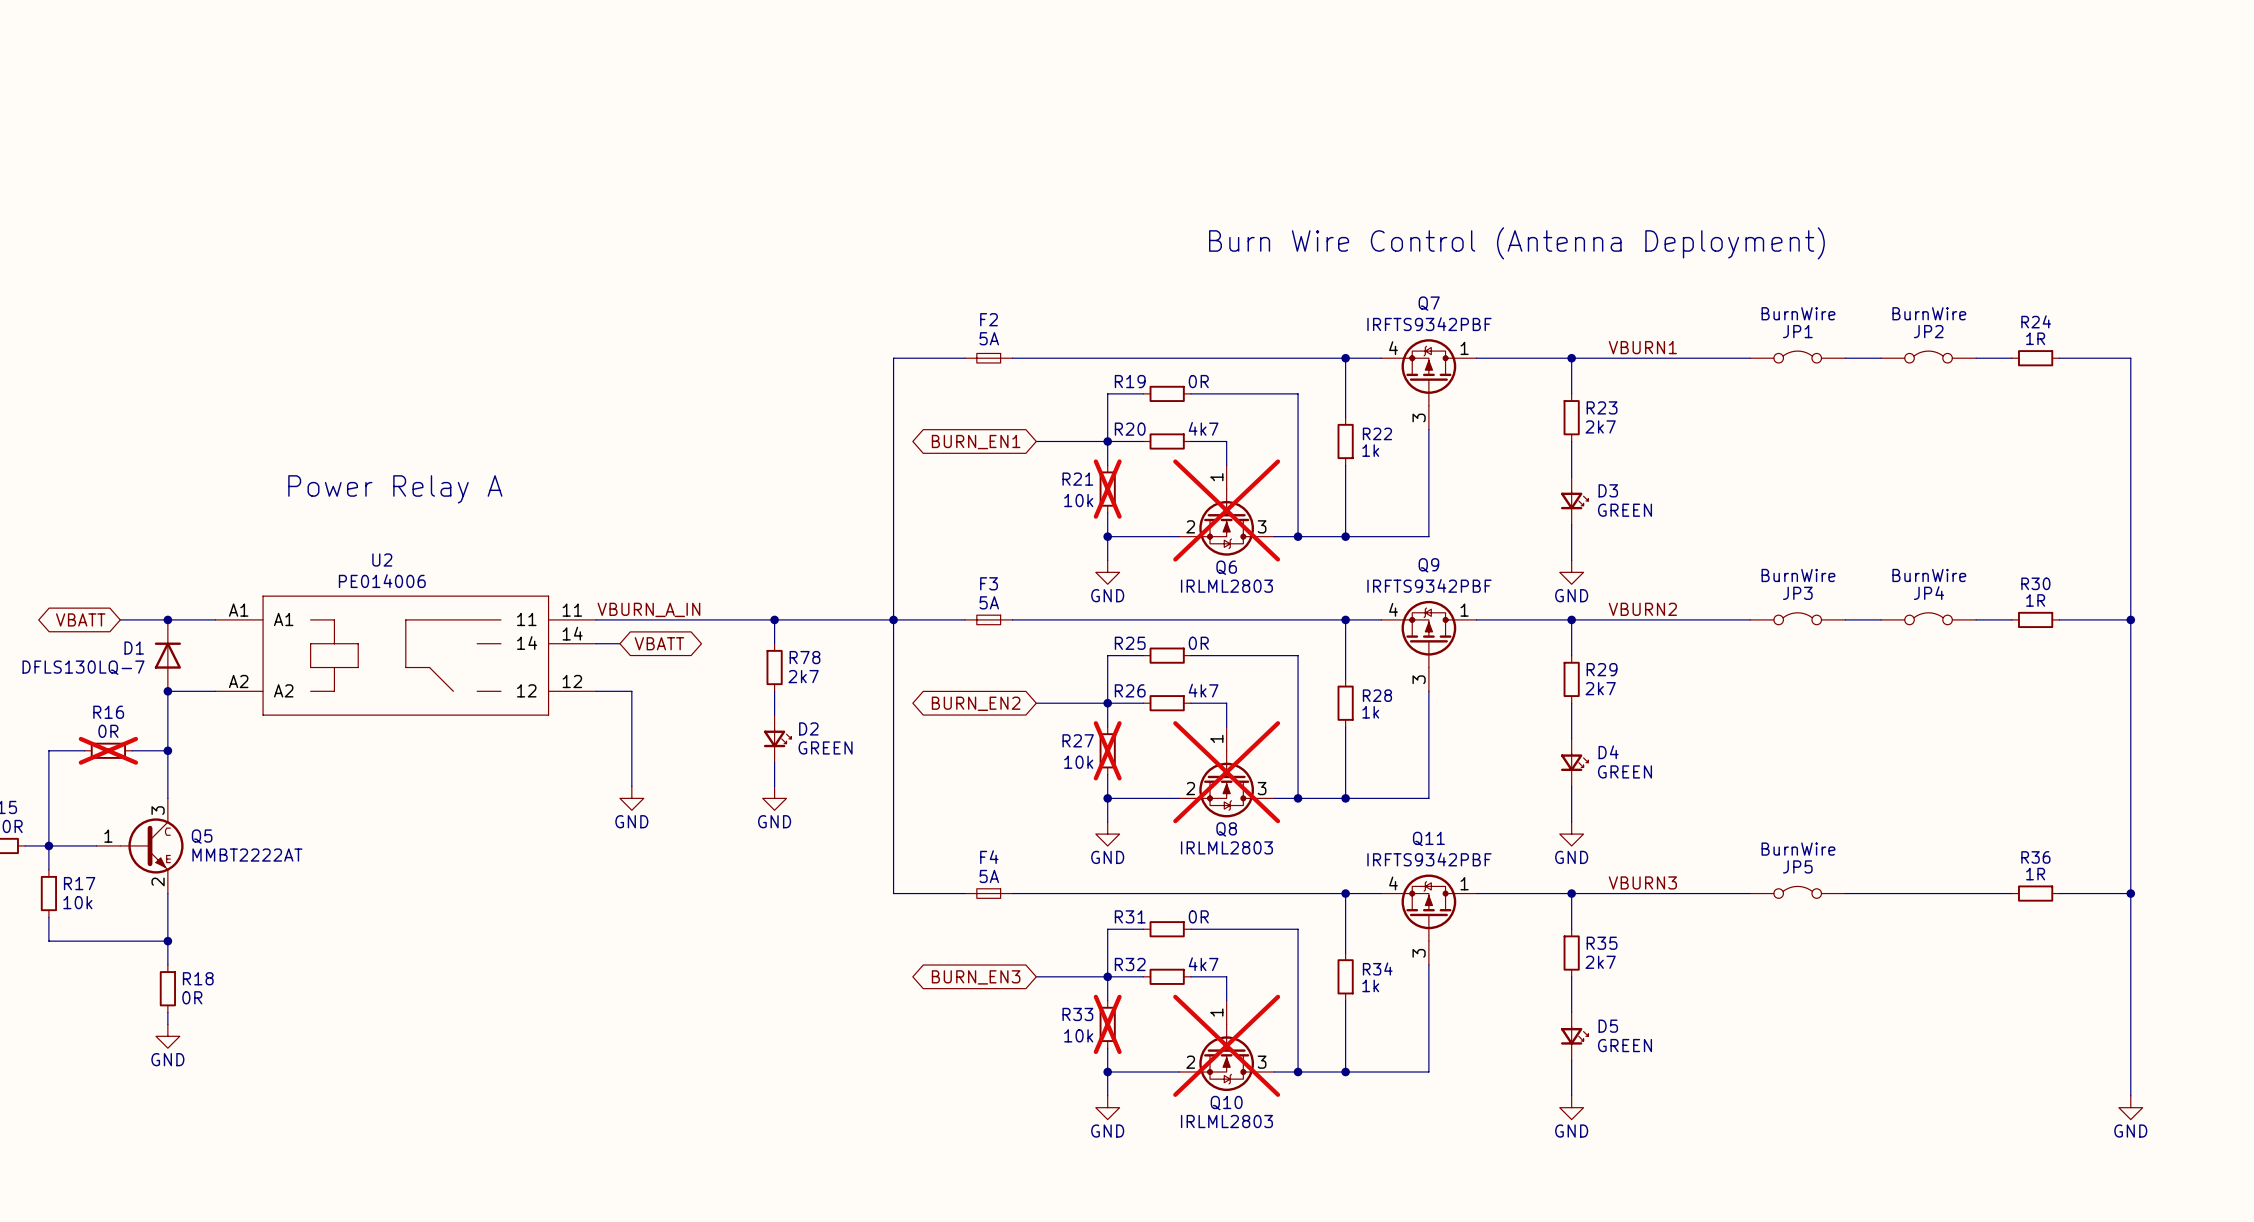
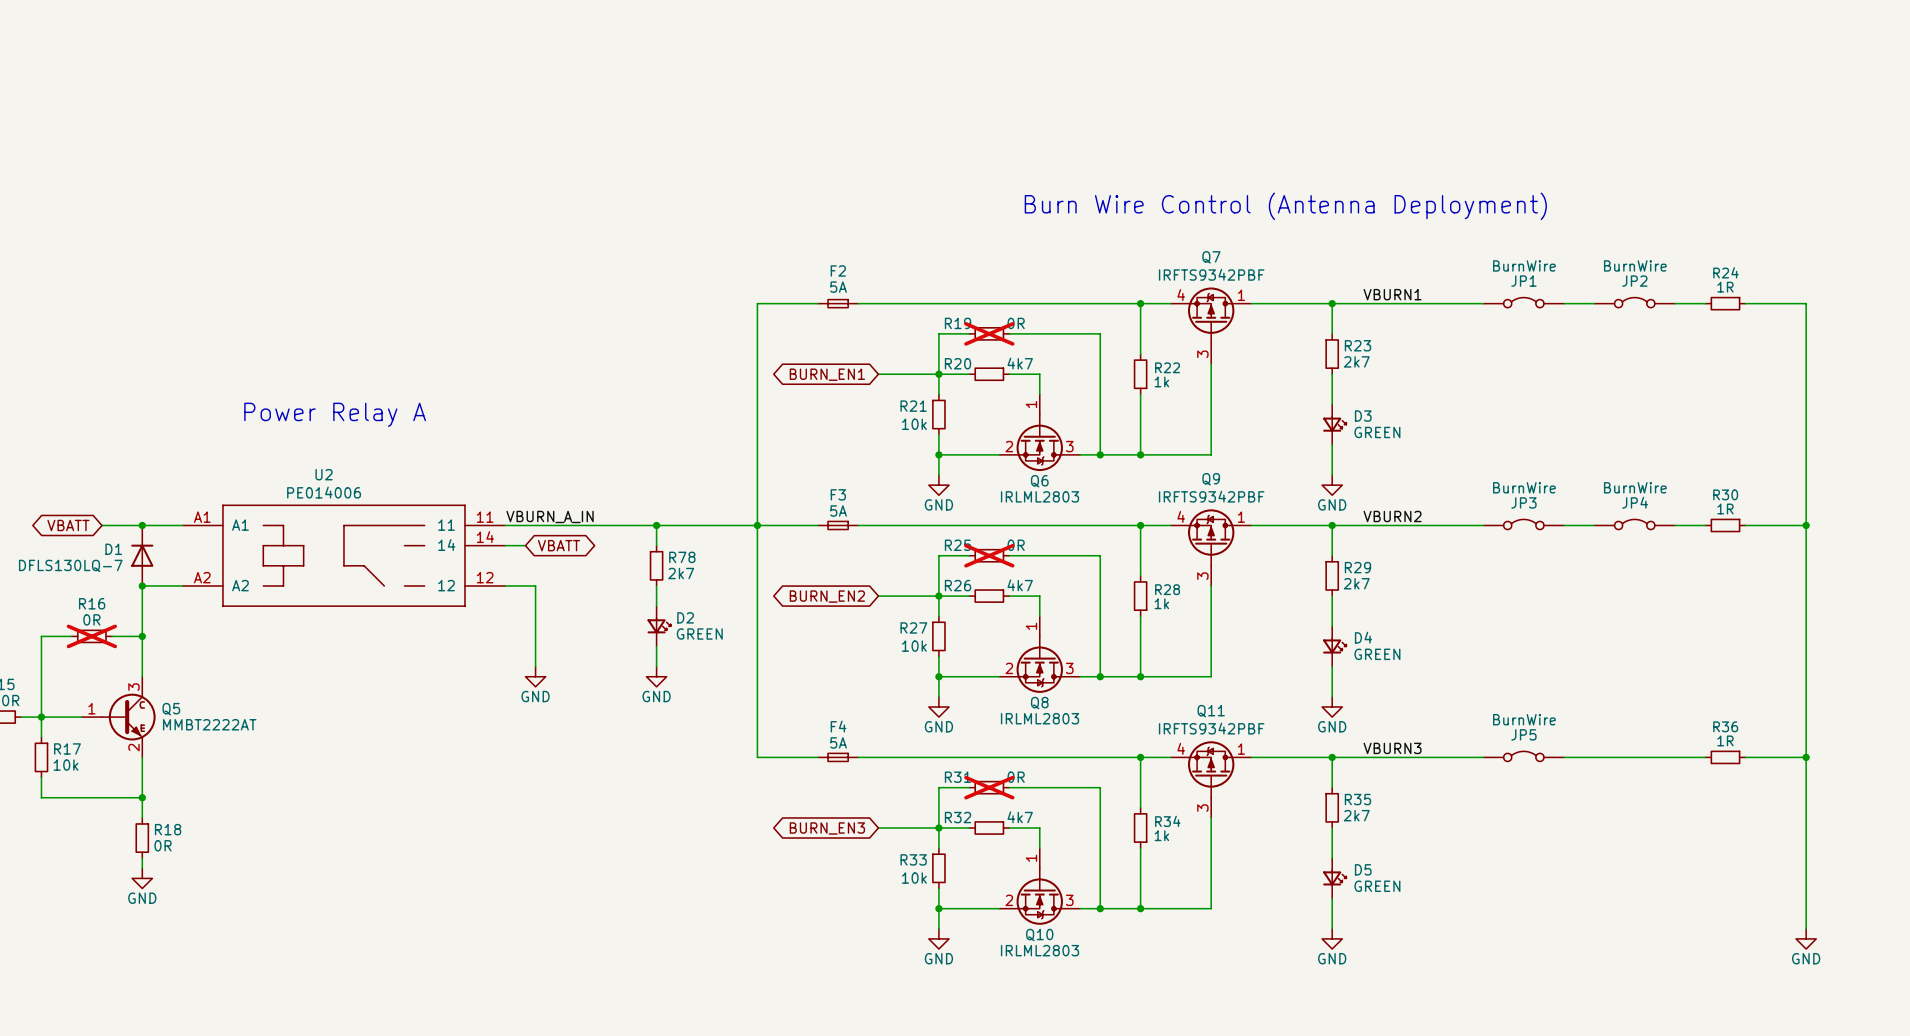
R19 do-not-place cross: none -> (989, 333)
R21 do-not-place cross: (1107, 489) -> none
Q6 do-not-place cross: (1226, 510) -> none
R25 do-not-place cross: none -> (989, 555)
R27 do-not-place cross: (1107, 750) -> none
Q8 do-not-place cross: (1226, 772) -> none
R31 do-not-place cross: none -> (989, 787)
R33 do-not-place cross: (1107, 1024) -> none
Q10 do-not-place cross: (1226, 1045) -> none

